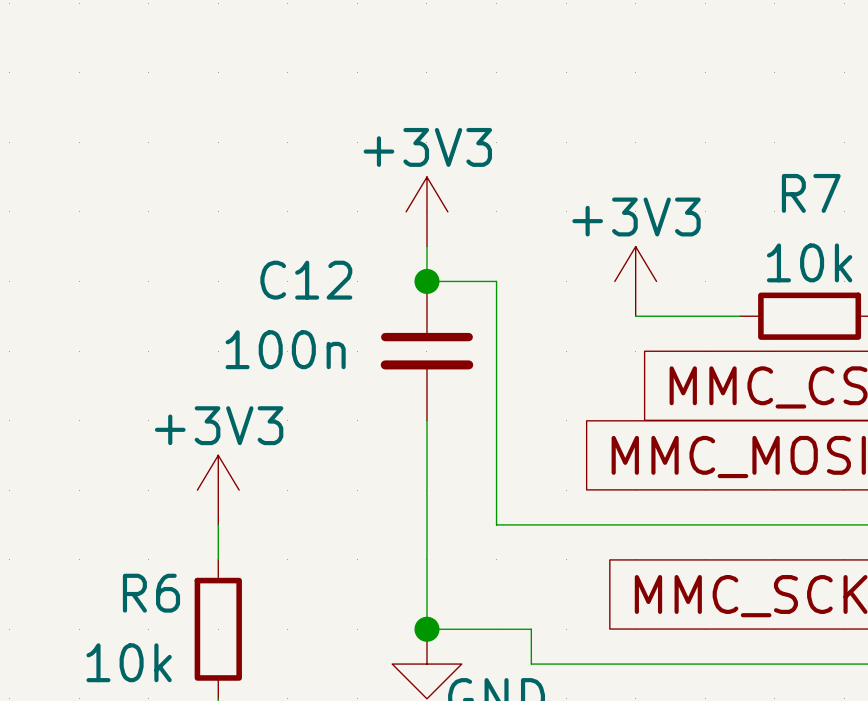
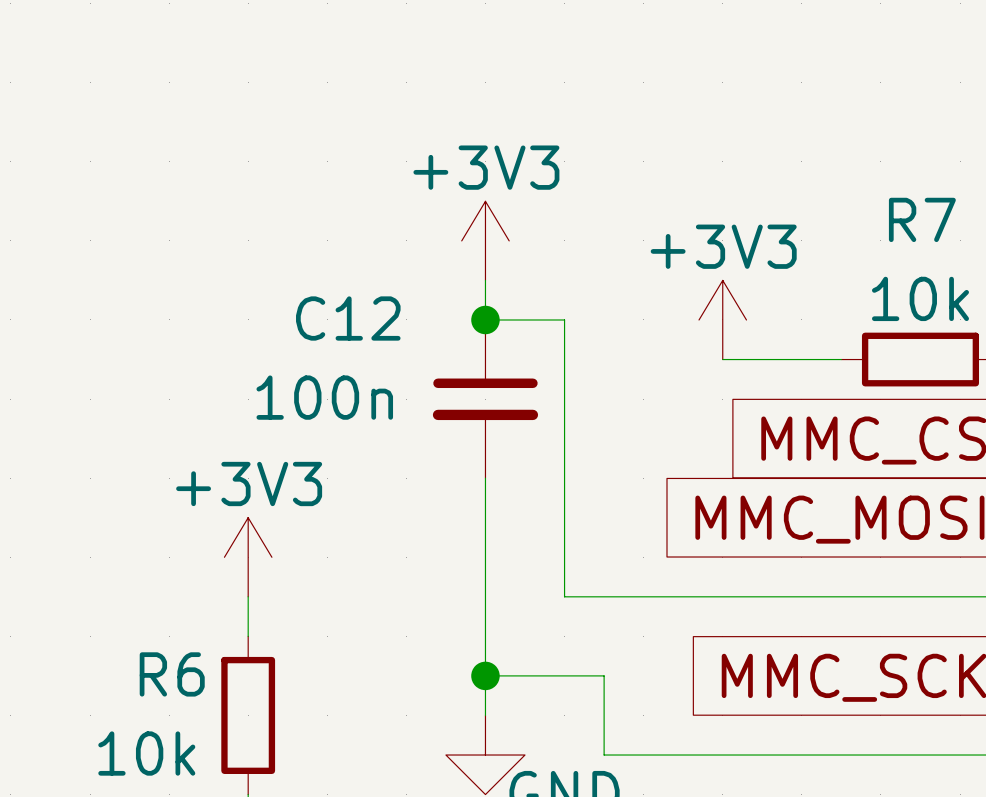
wire: (426, 629) (531, 629) -> (485, 675) (604, 675) (604, 715)
junction position: (426, 629) -> (485, 675)

